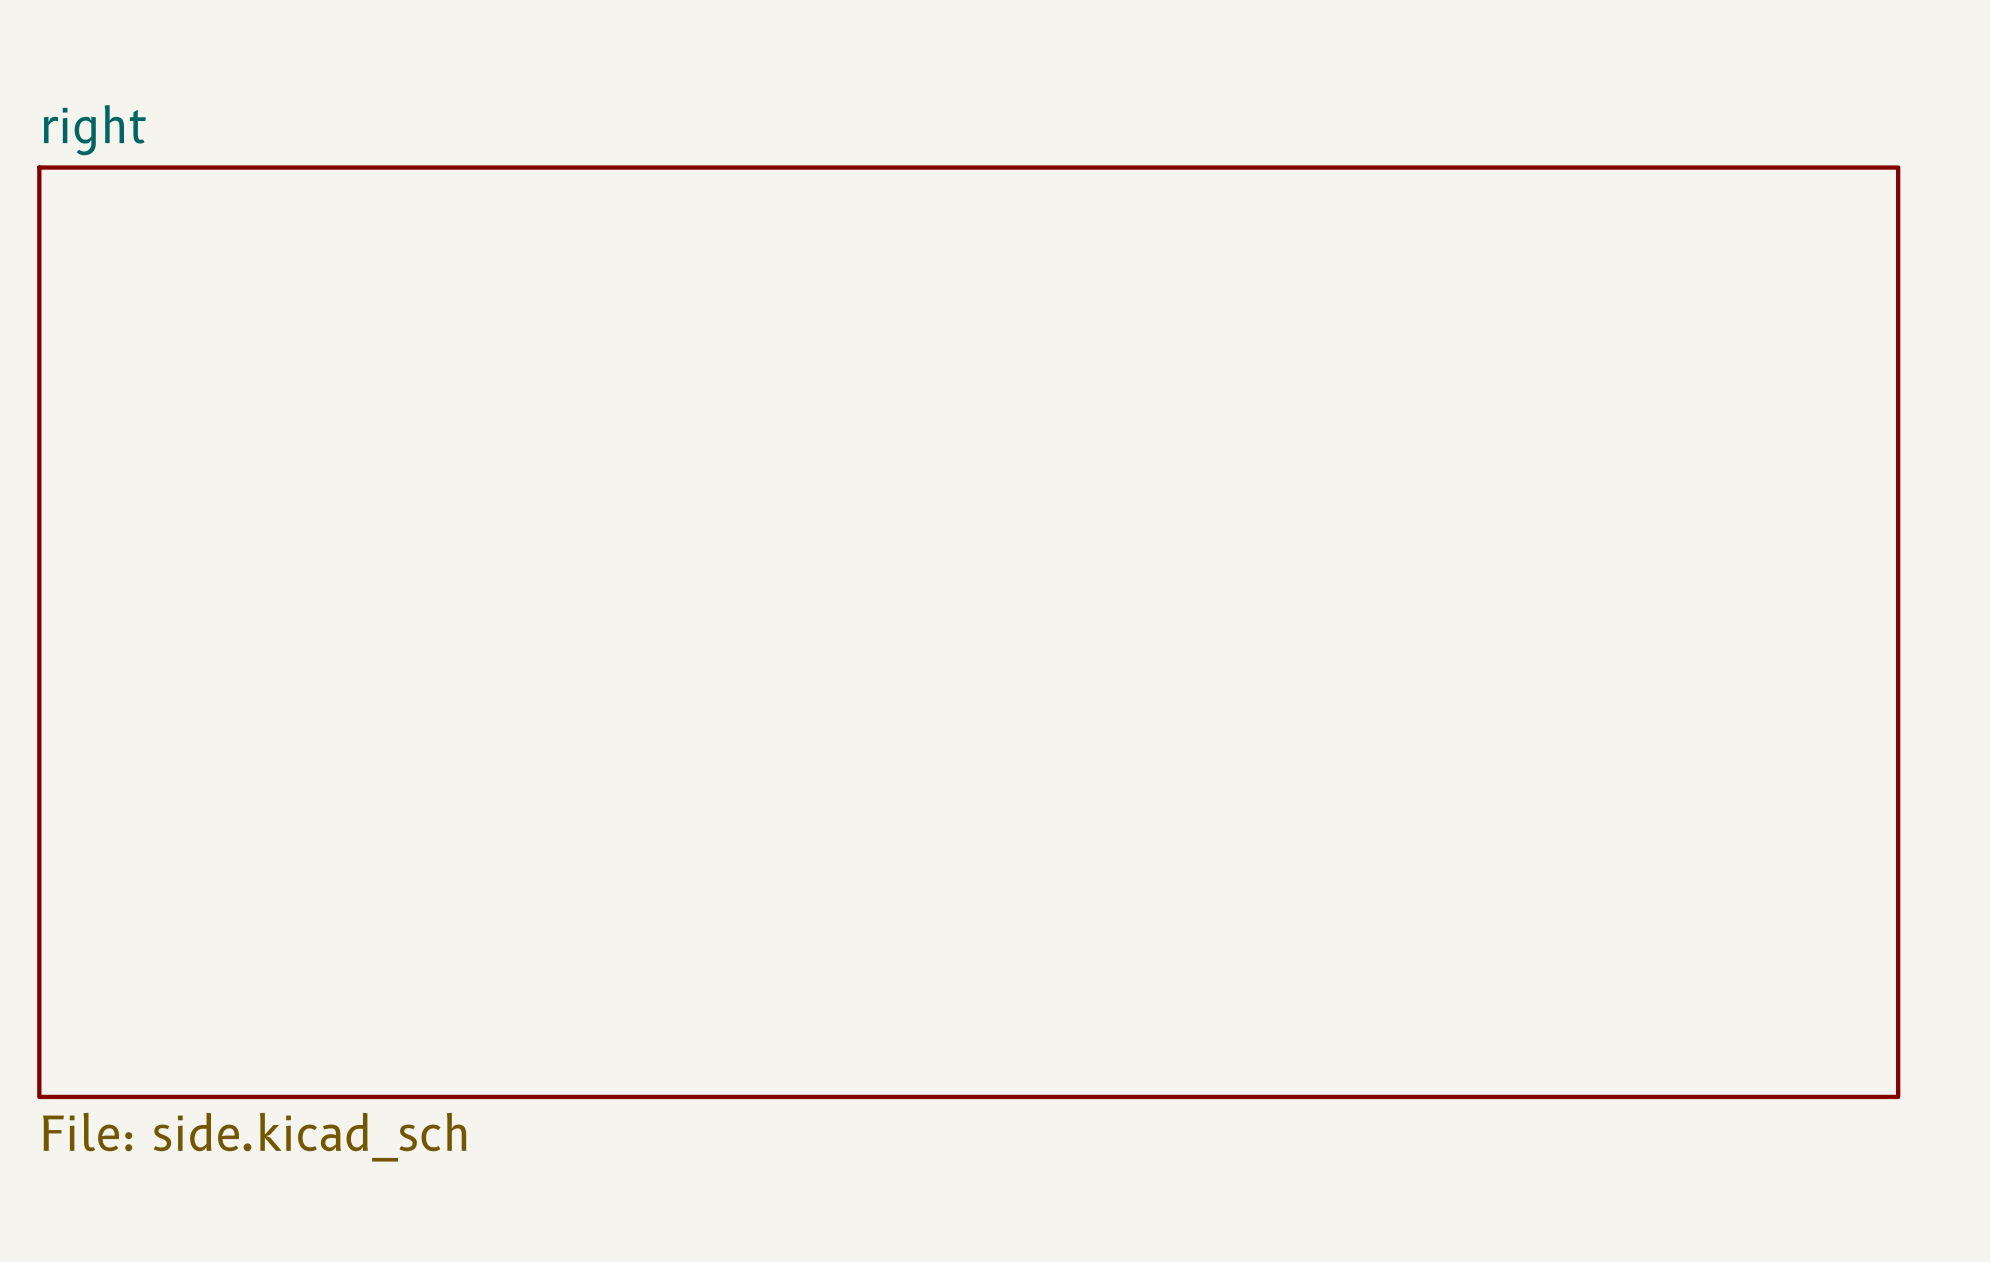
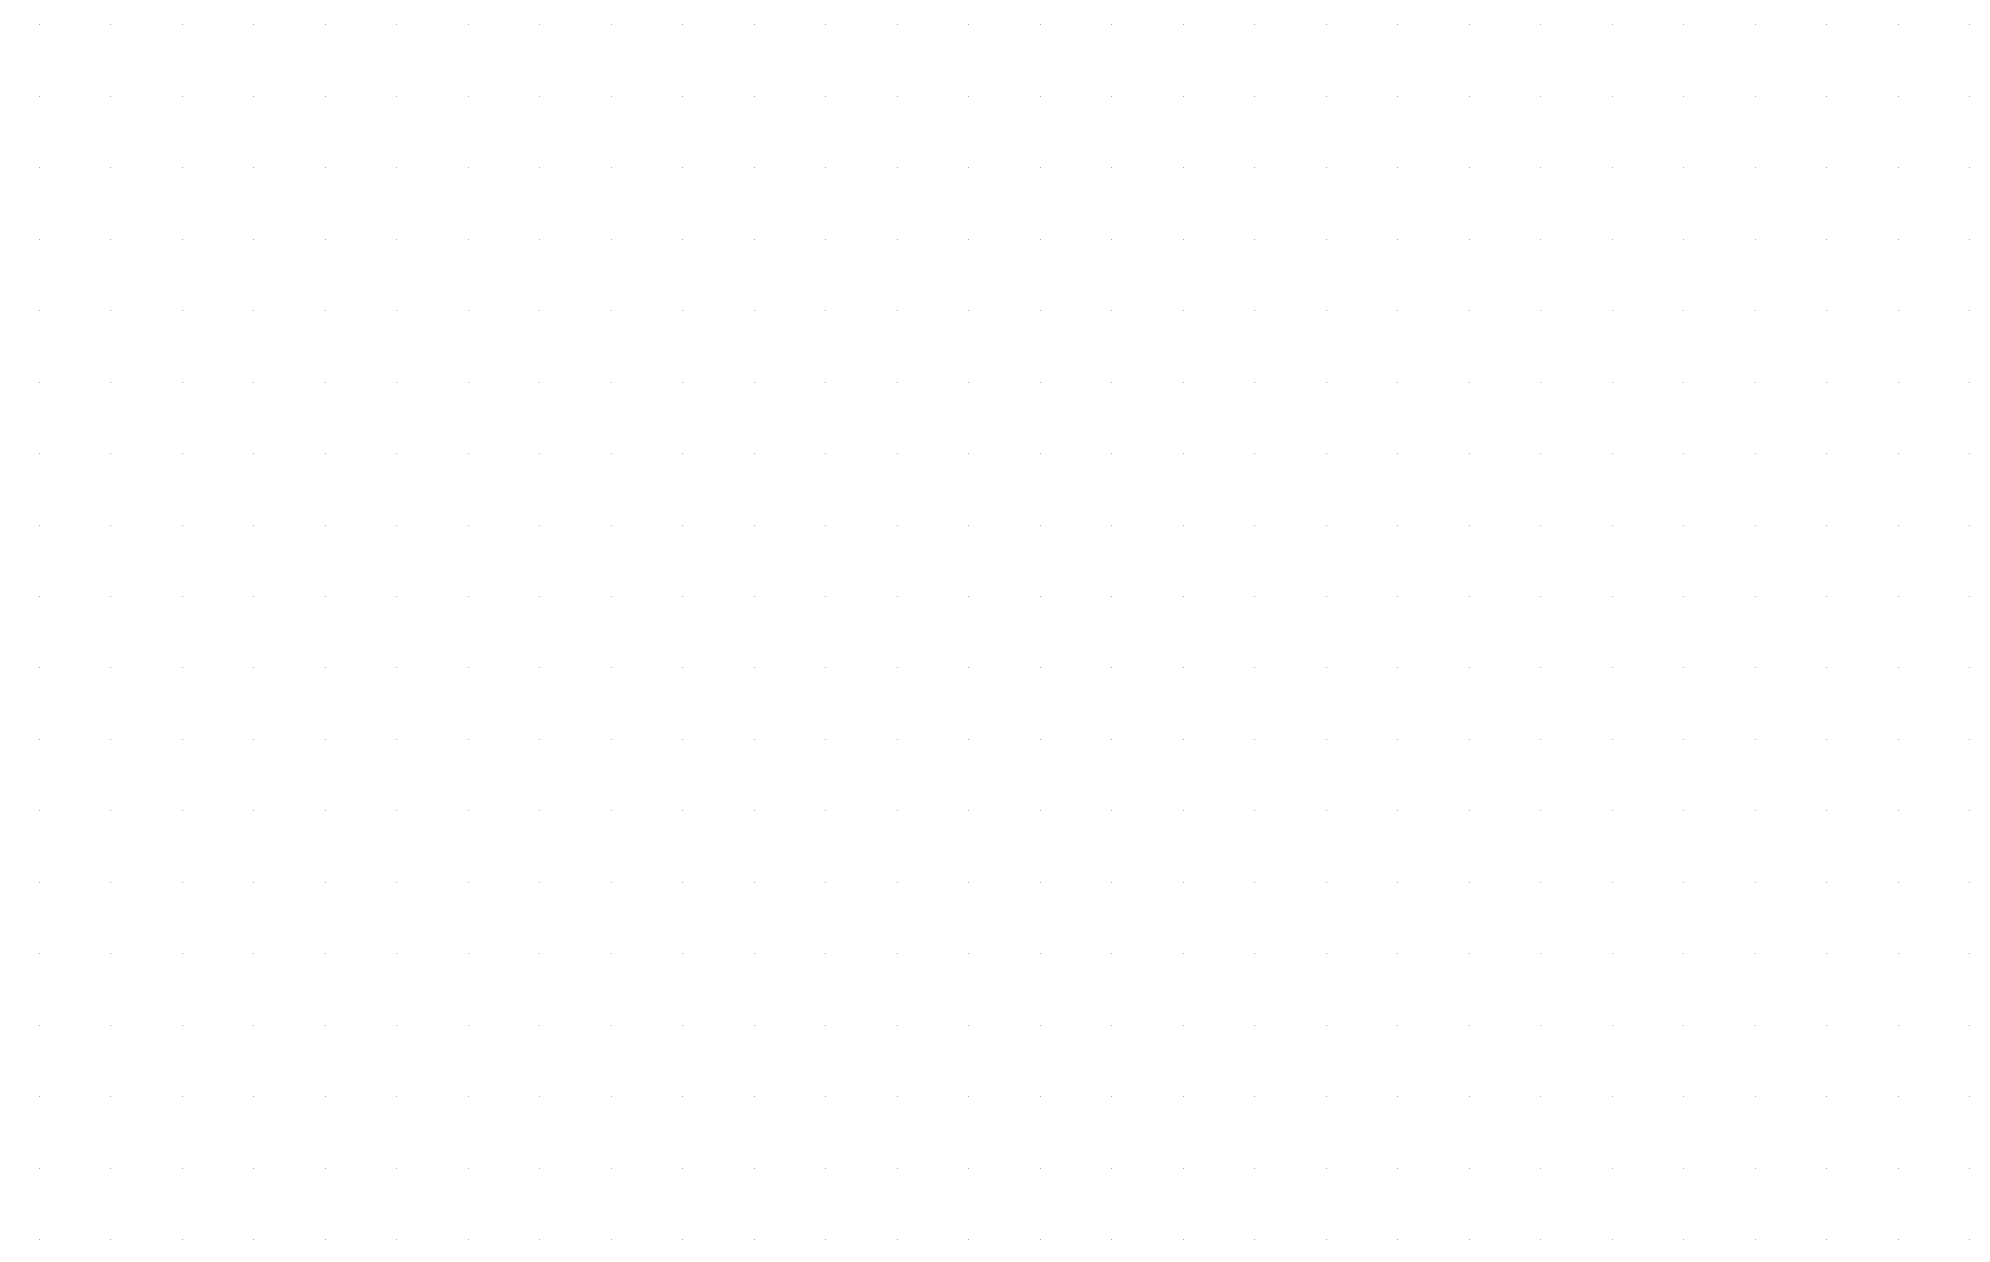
sheet right: File: side.kicad_sch (968, 632) -> none

